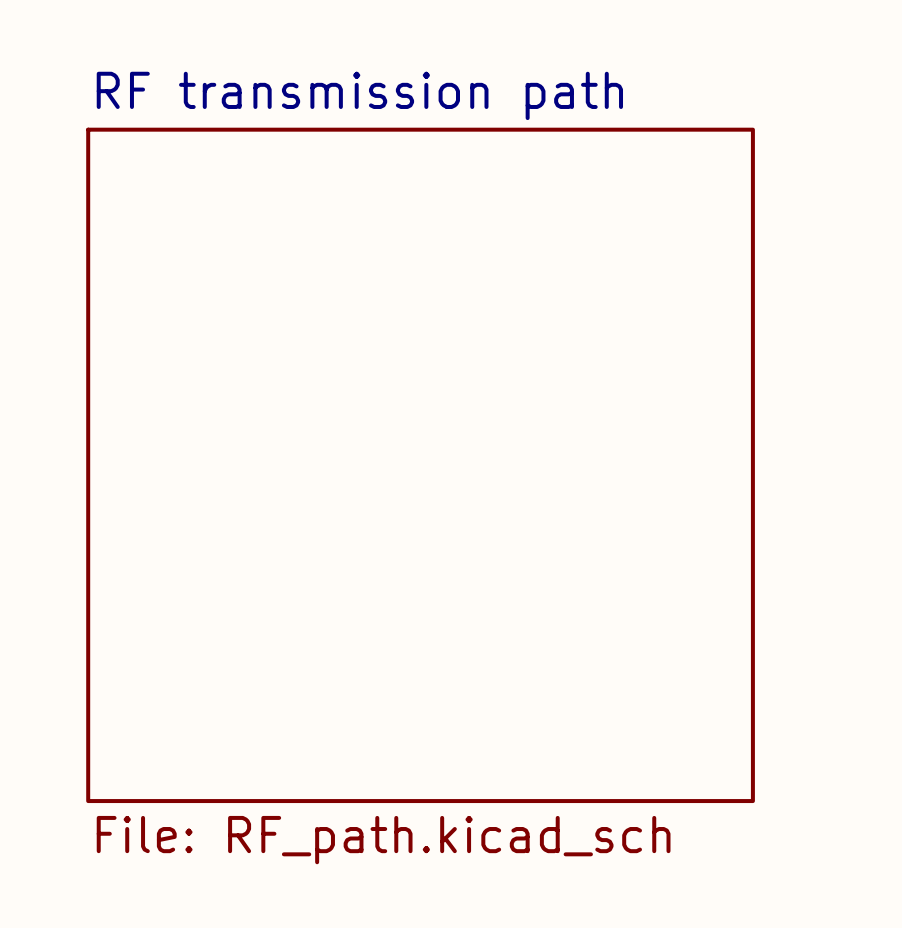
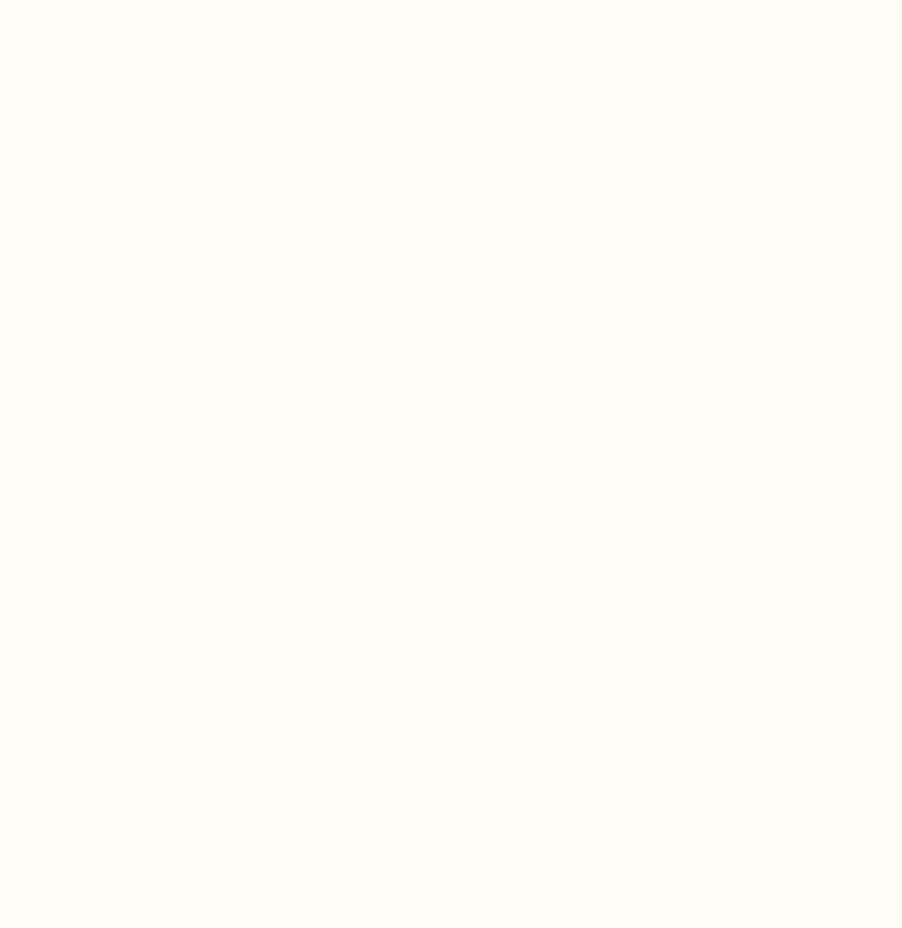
sheet RF transmission path: File: RF_path.kicad_sch (420, 465) -> none

